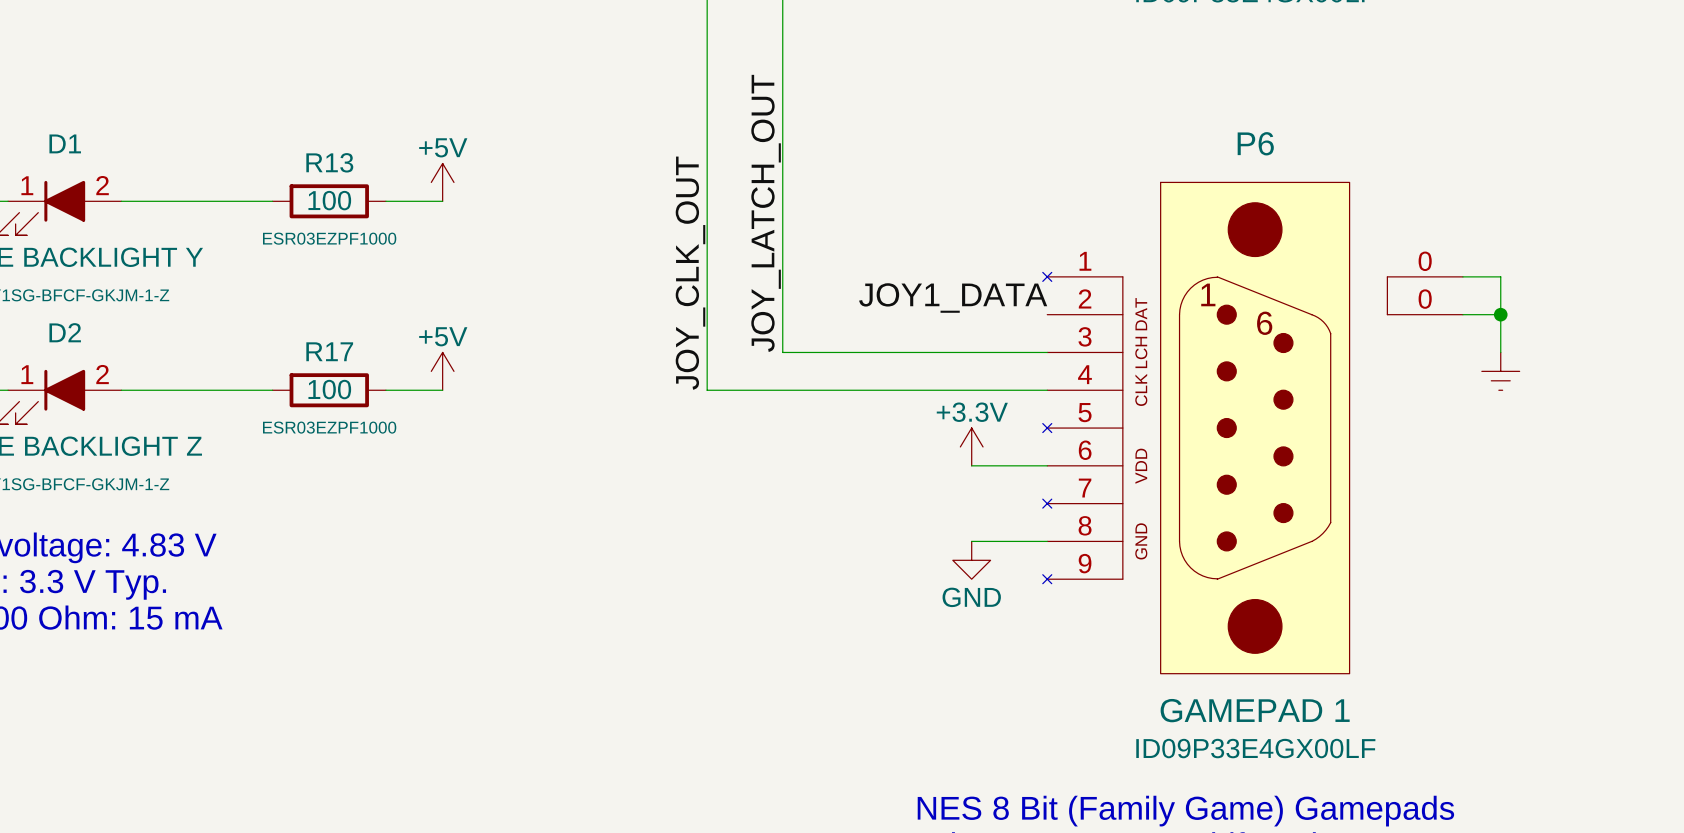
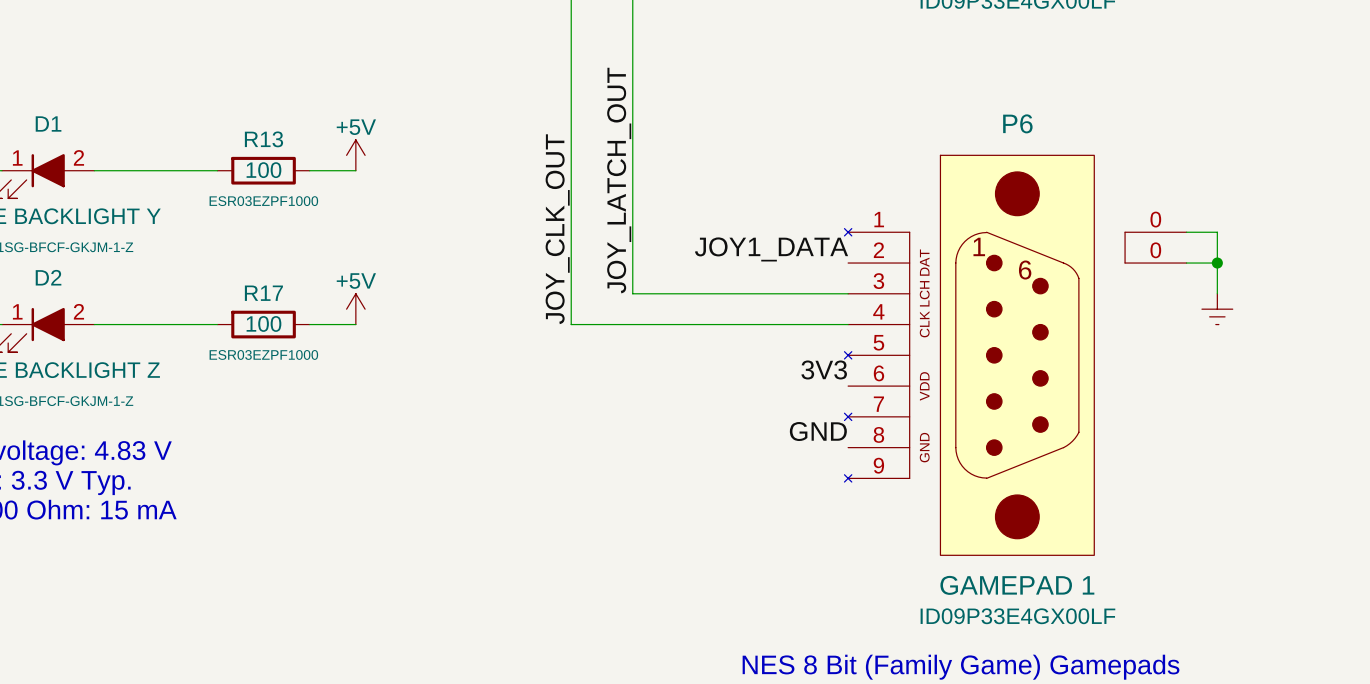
power symbol: +3.3V (971, 446) -> none
label: none -> 3V3 (824, 369)
wire: (971, 465) (1047, 465) -> none
label: none -> GND (818, 431)
wire: (971, 541) (1047, 541) -> none
power symbol: GND (971, 560) -> none

